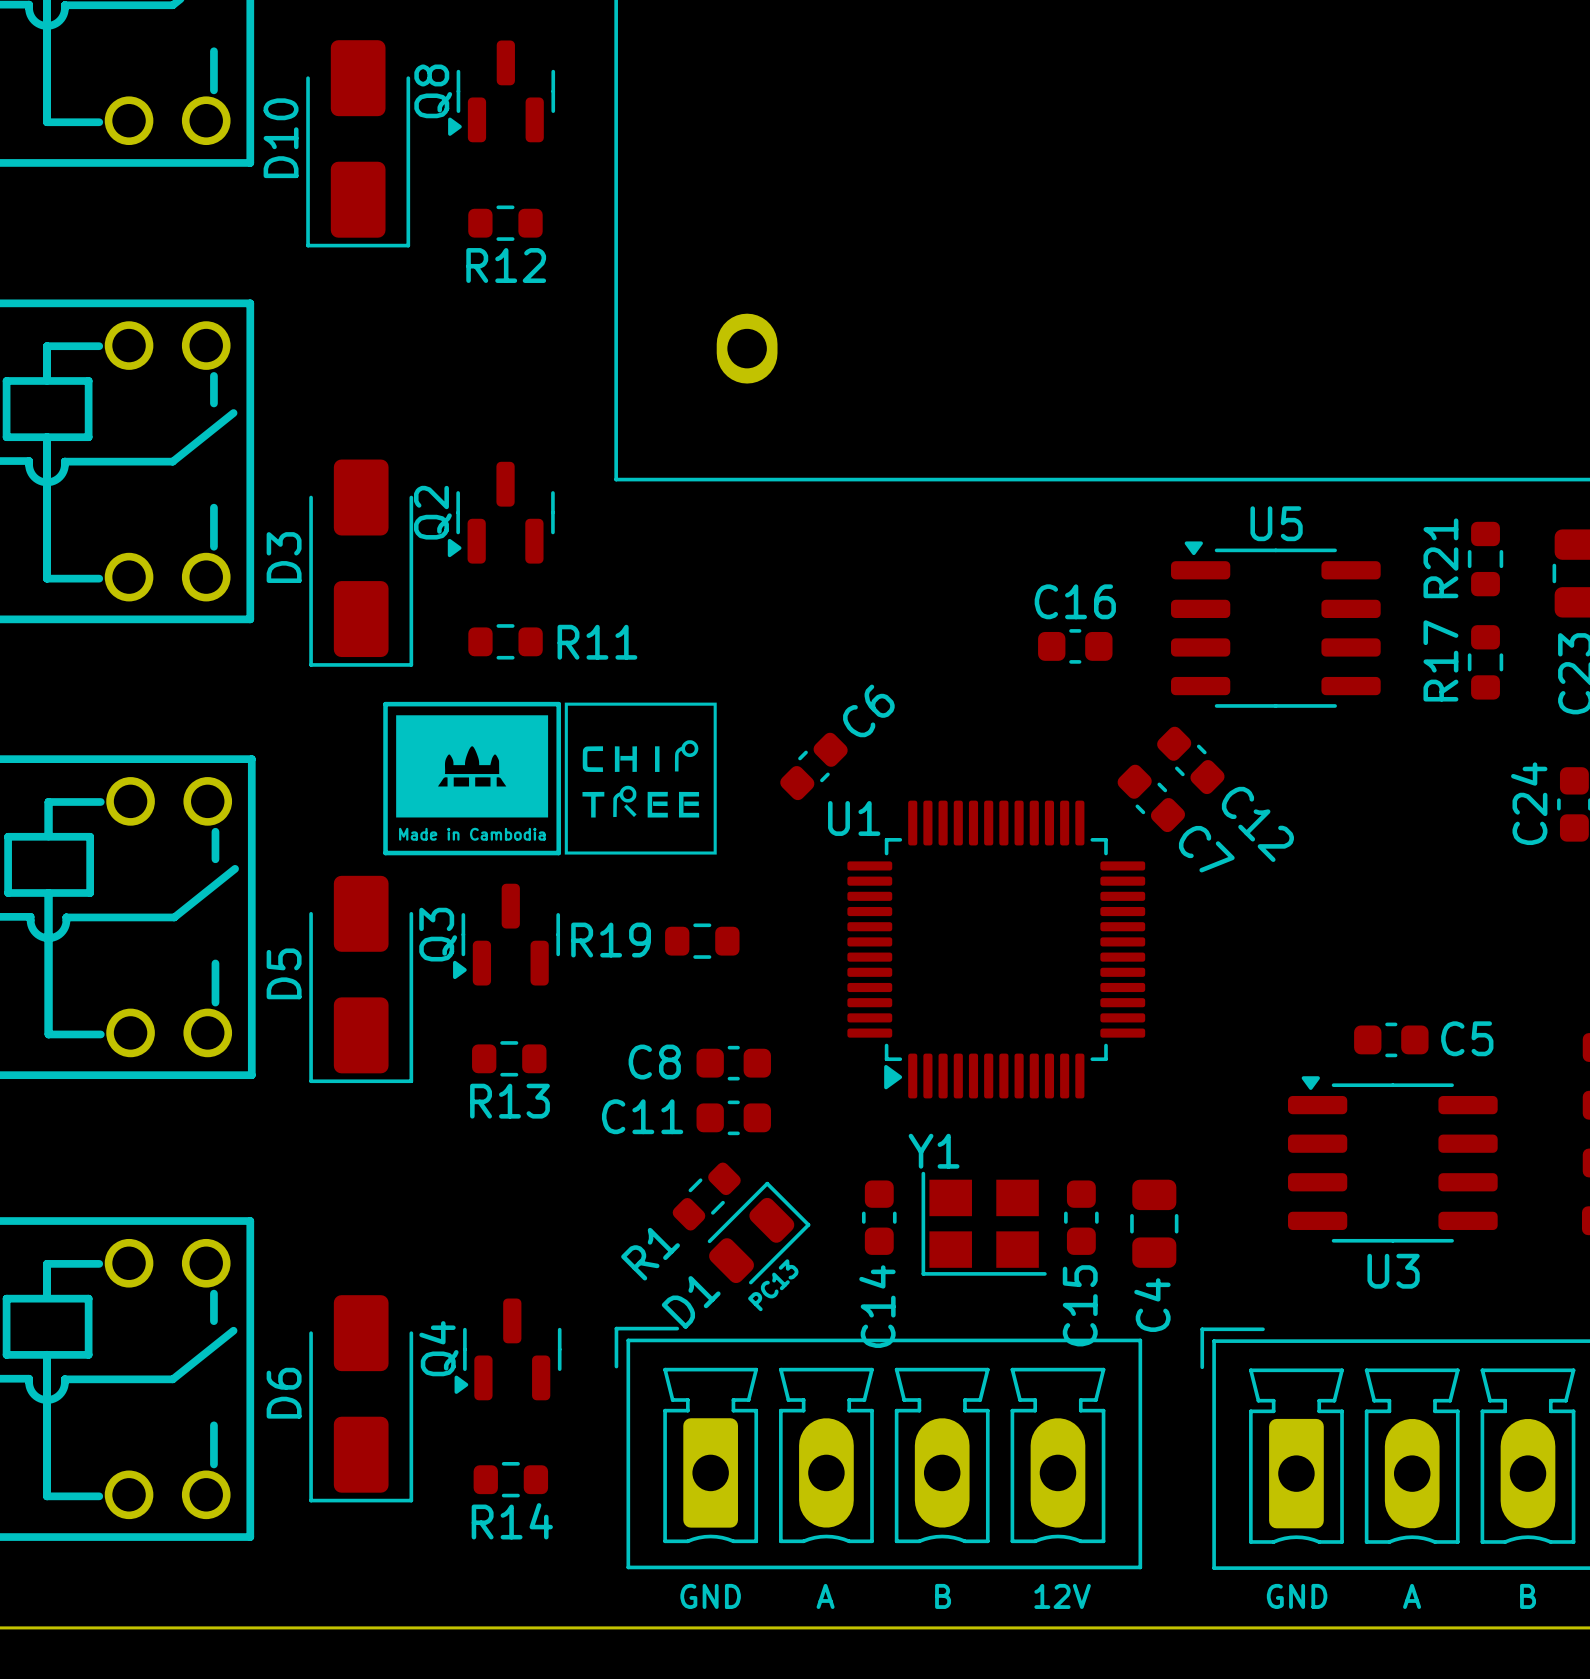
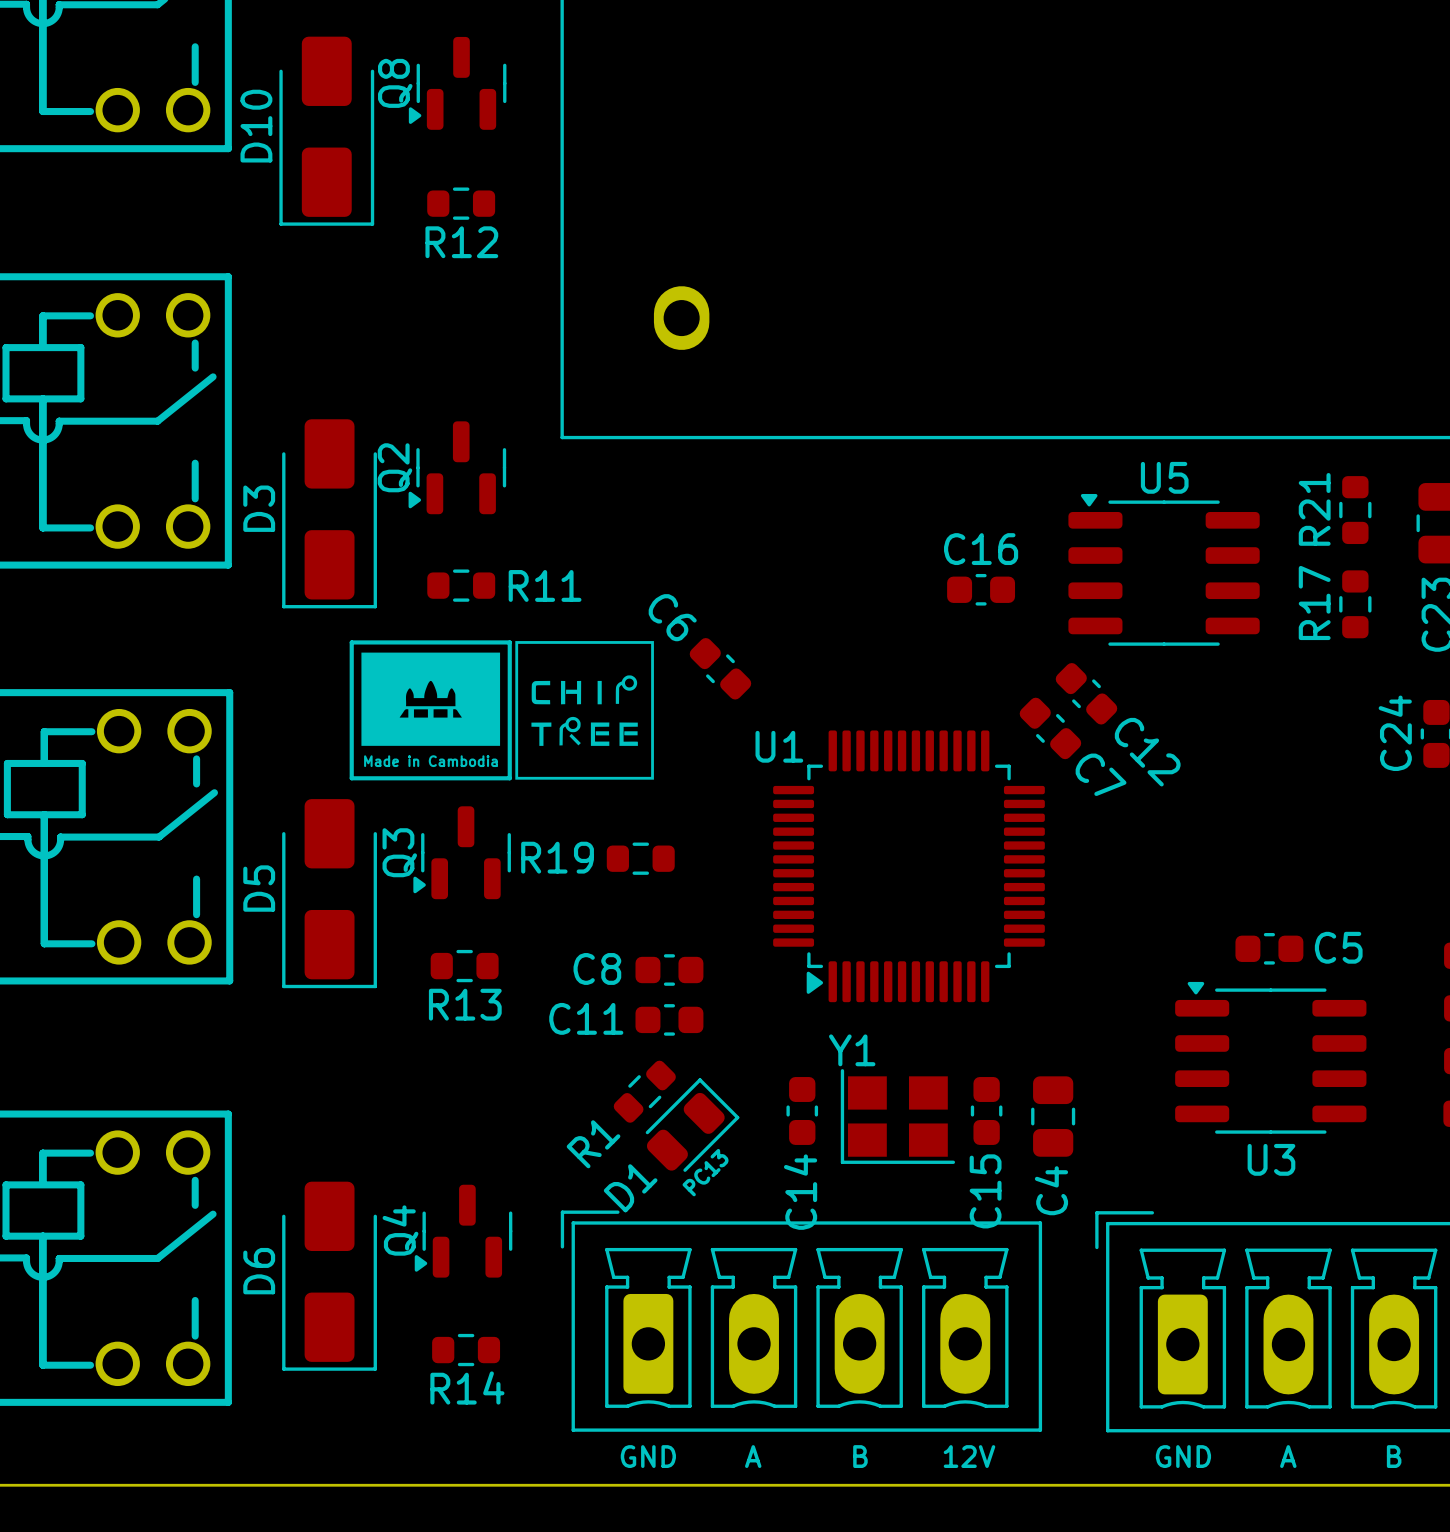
C6 name position: C6 (868, 710) -> C6 (672, 617)
C6 rotation: 0° (813, 766) -> 90° clockwise (720, 668)
C6 position: (813, 766) -> (720, 668)

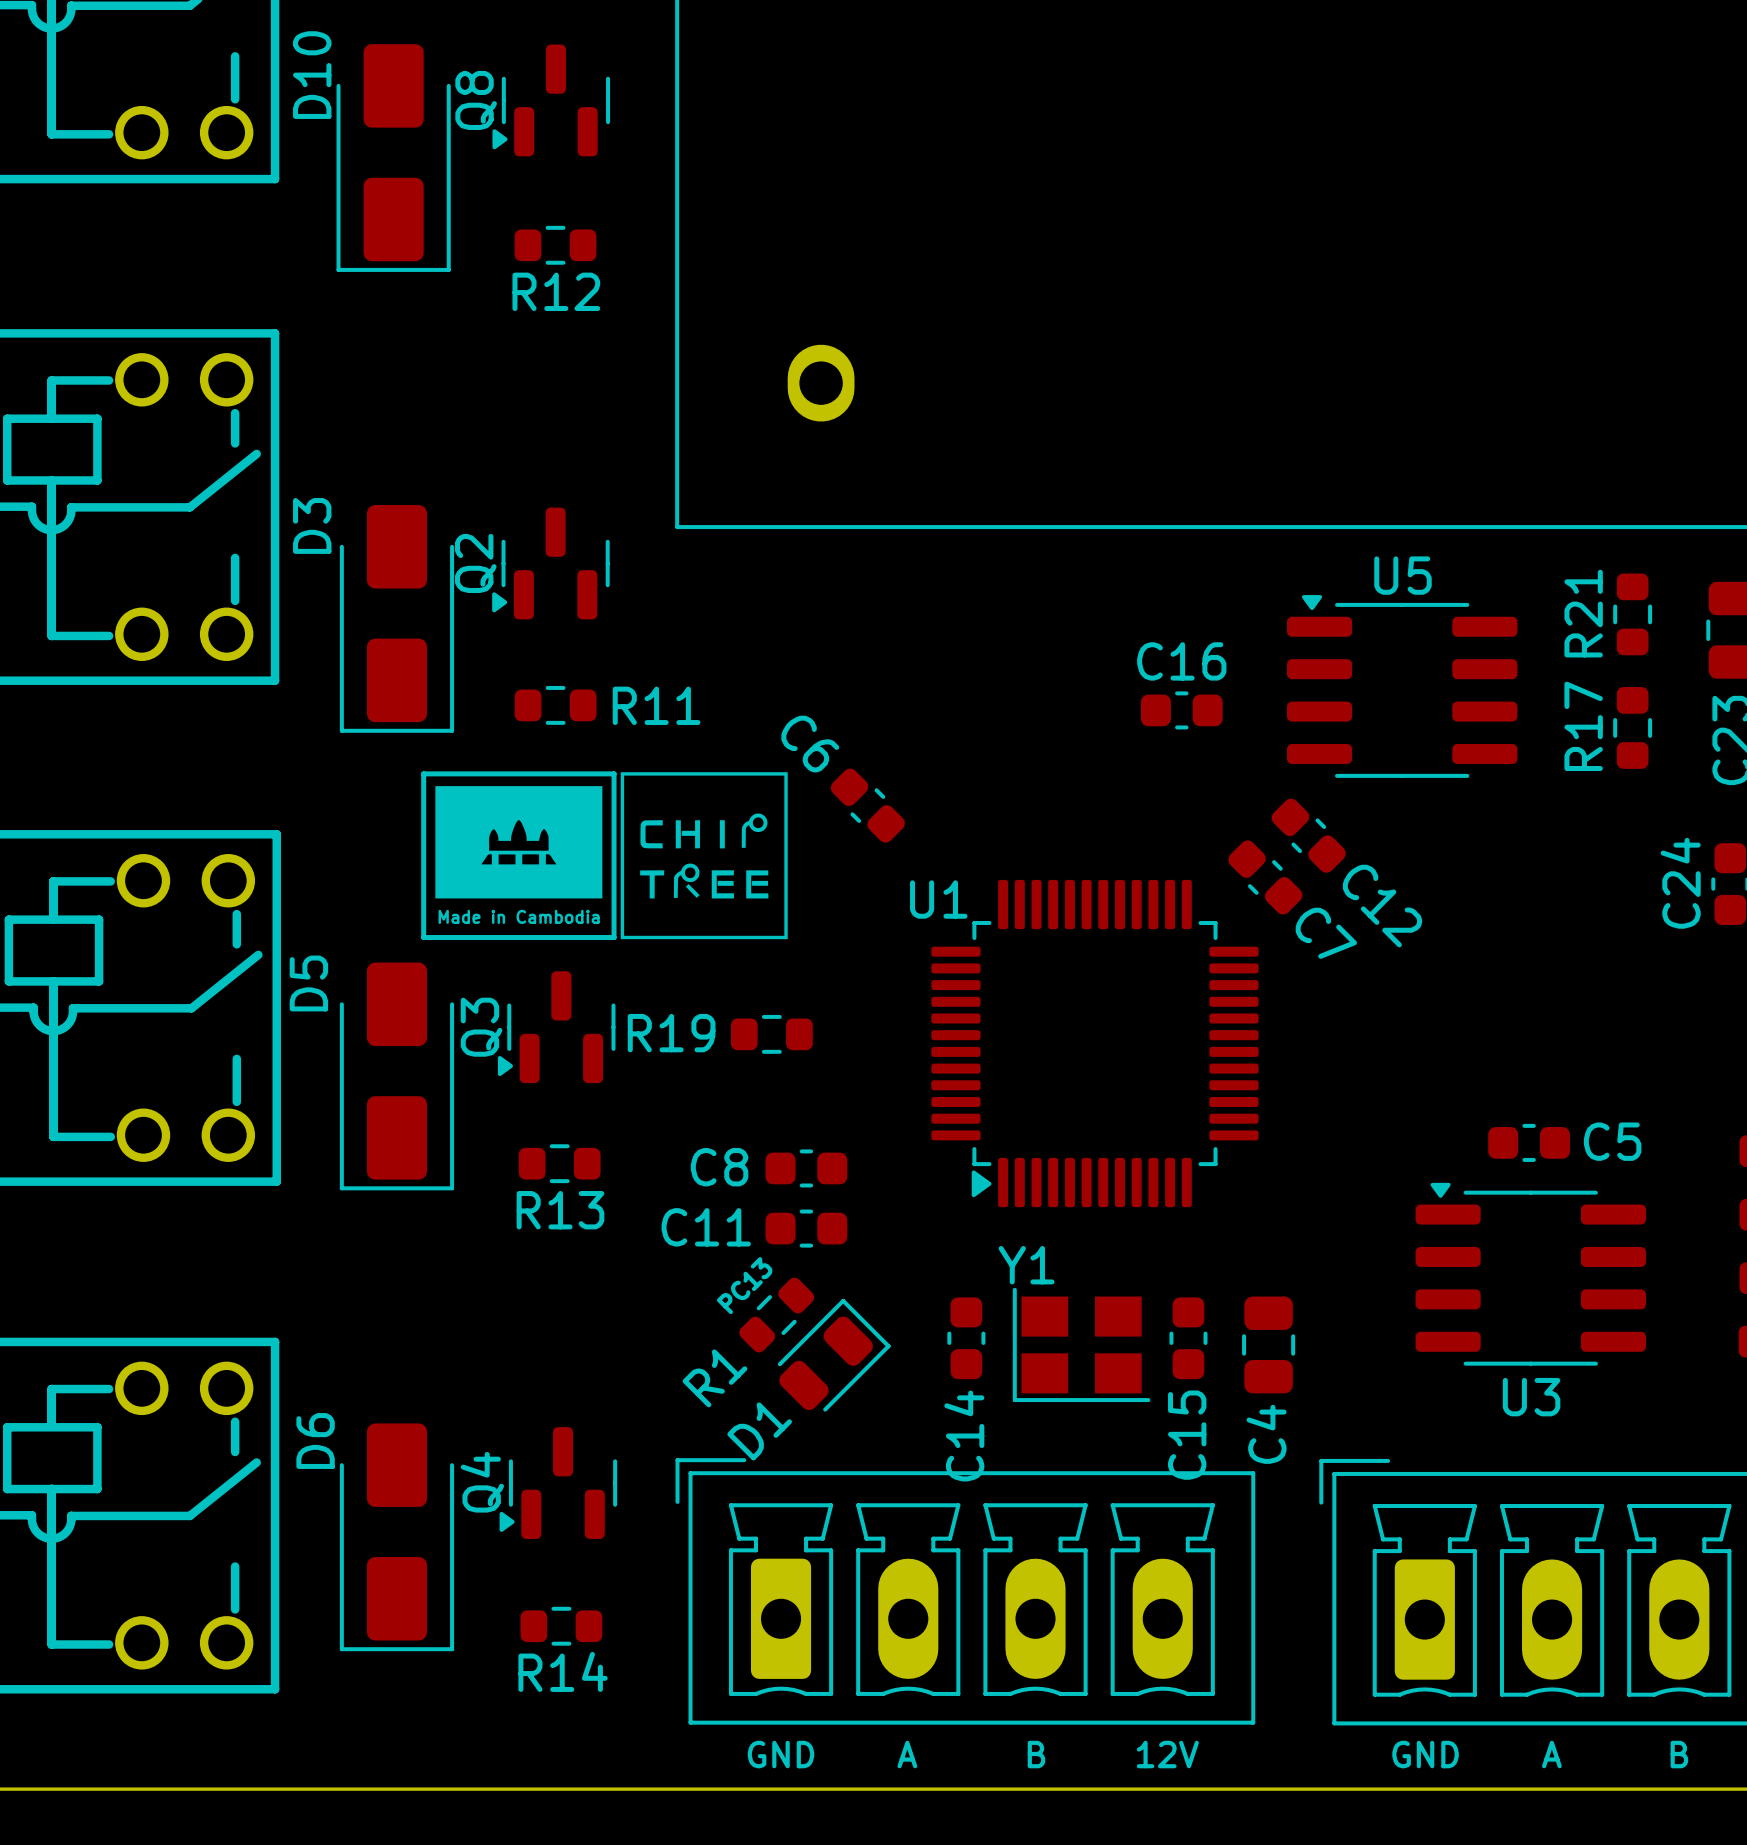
D10 name position: D10 (256, 126) -> D10 (312, 75)
D3 name position: D3 (259, 508) -> D3 (312, 525)
D5 name position: D5 (259, 888) -> D5 (308, 983)
text position: PC13 (705, 1172) -> PC13 (744, 1285)
D6 name position: D6 (259, 1271) -> D6 (315, 1441)

